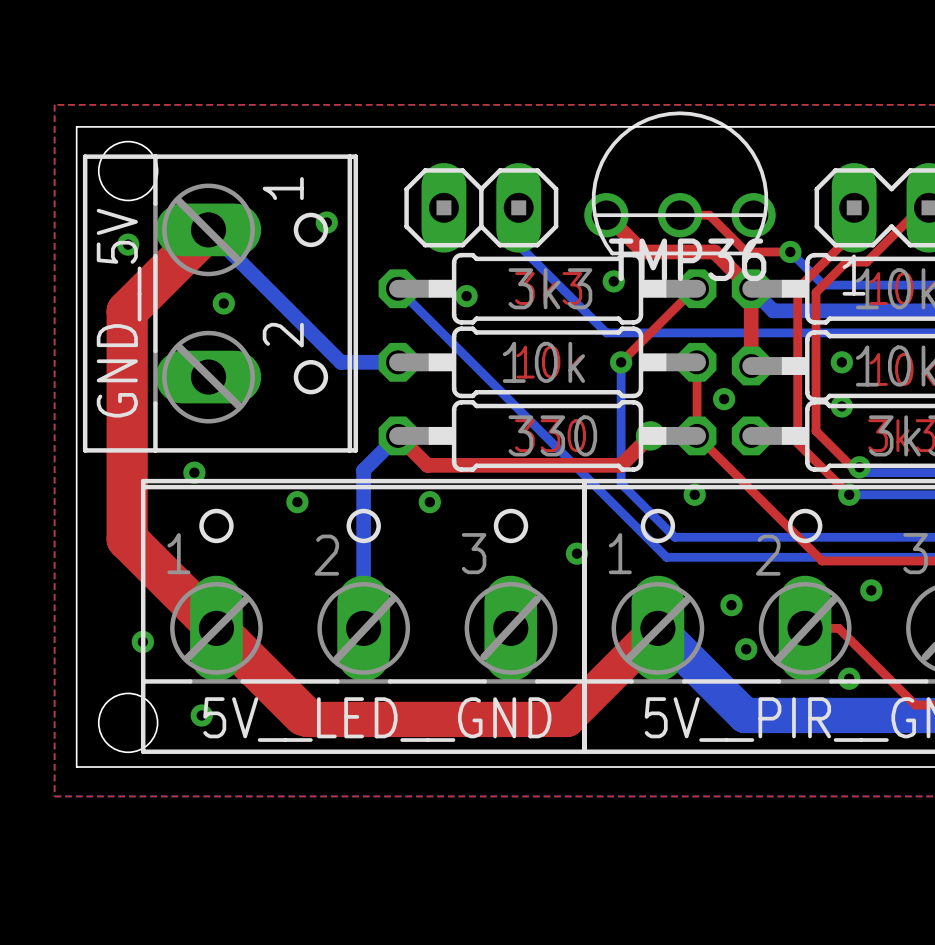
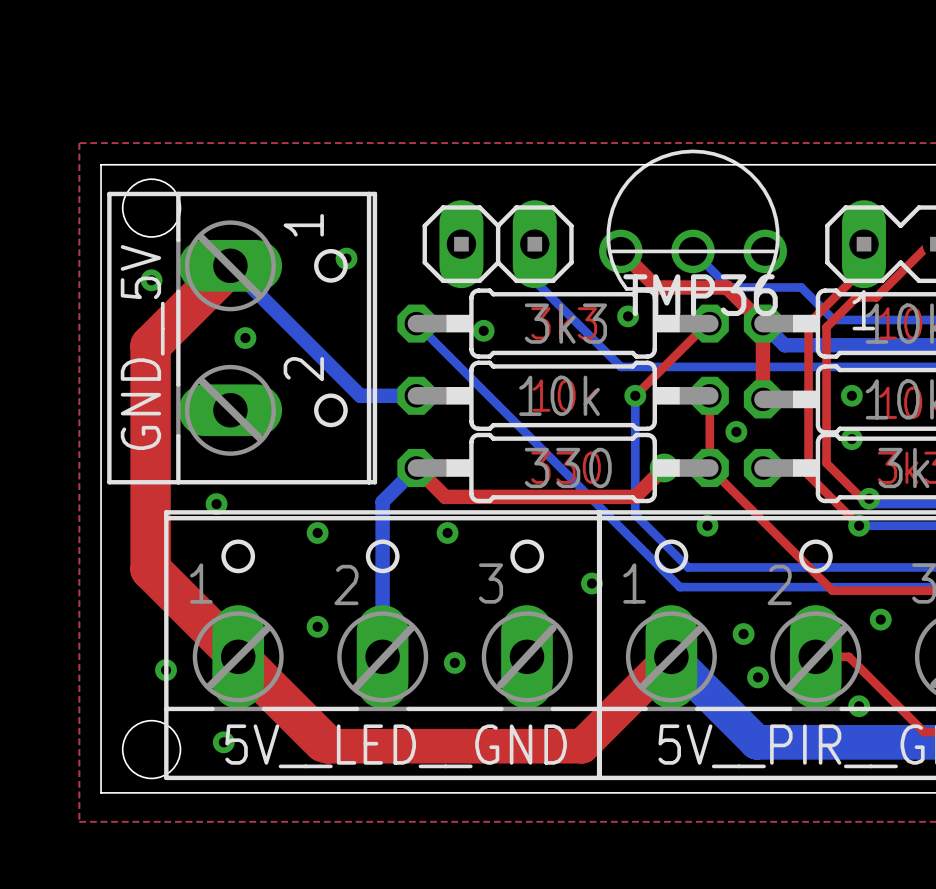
bottom track: none -> (693, 251) (729, 287) (801, 287)
top track: (679, 215) (709, 215) (746, 251) (790, 251) -> none
via: (790, 251) -> none
via: none -> (317, 626)
via: none -> (454, 662)

